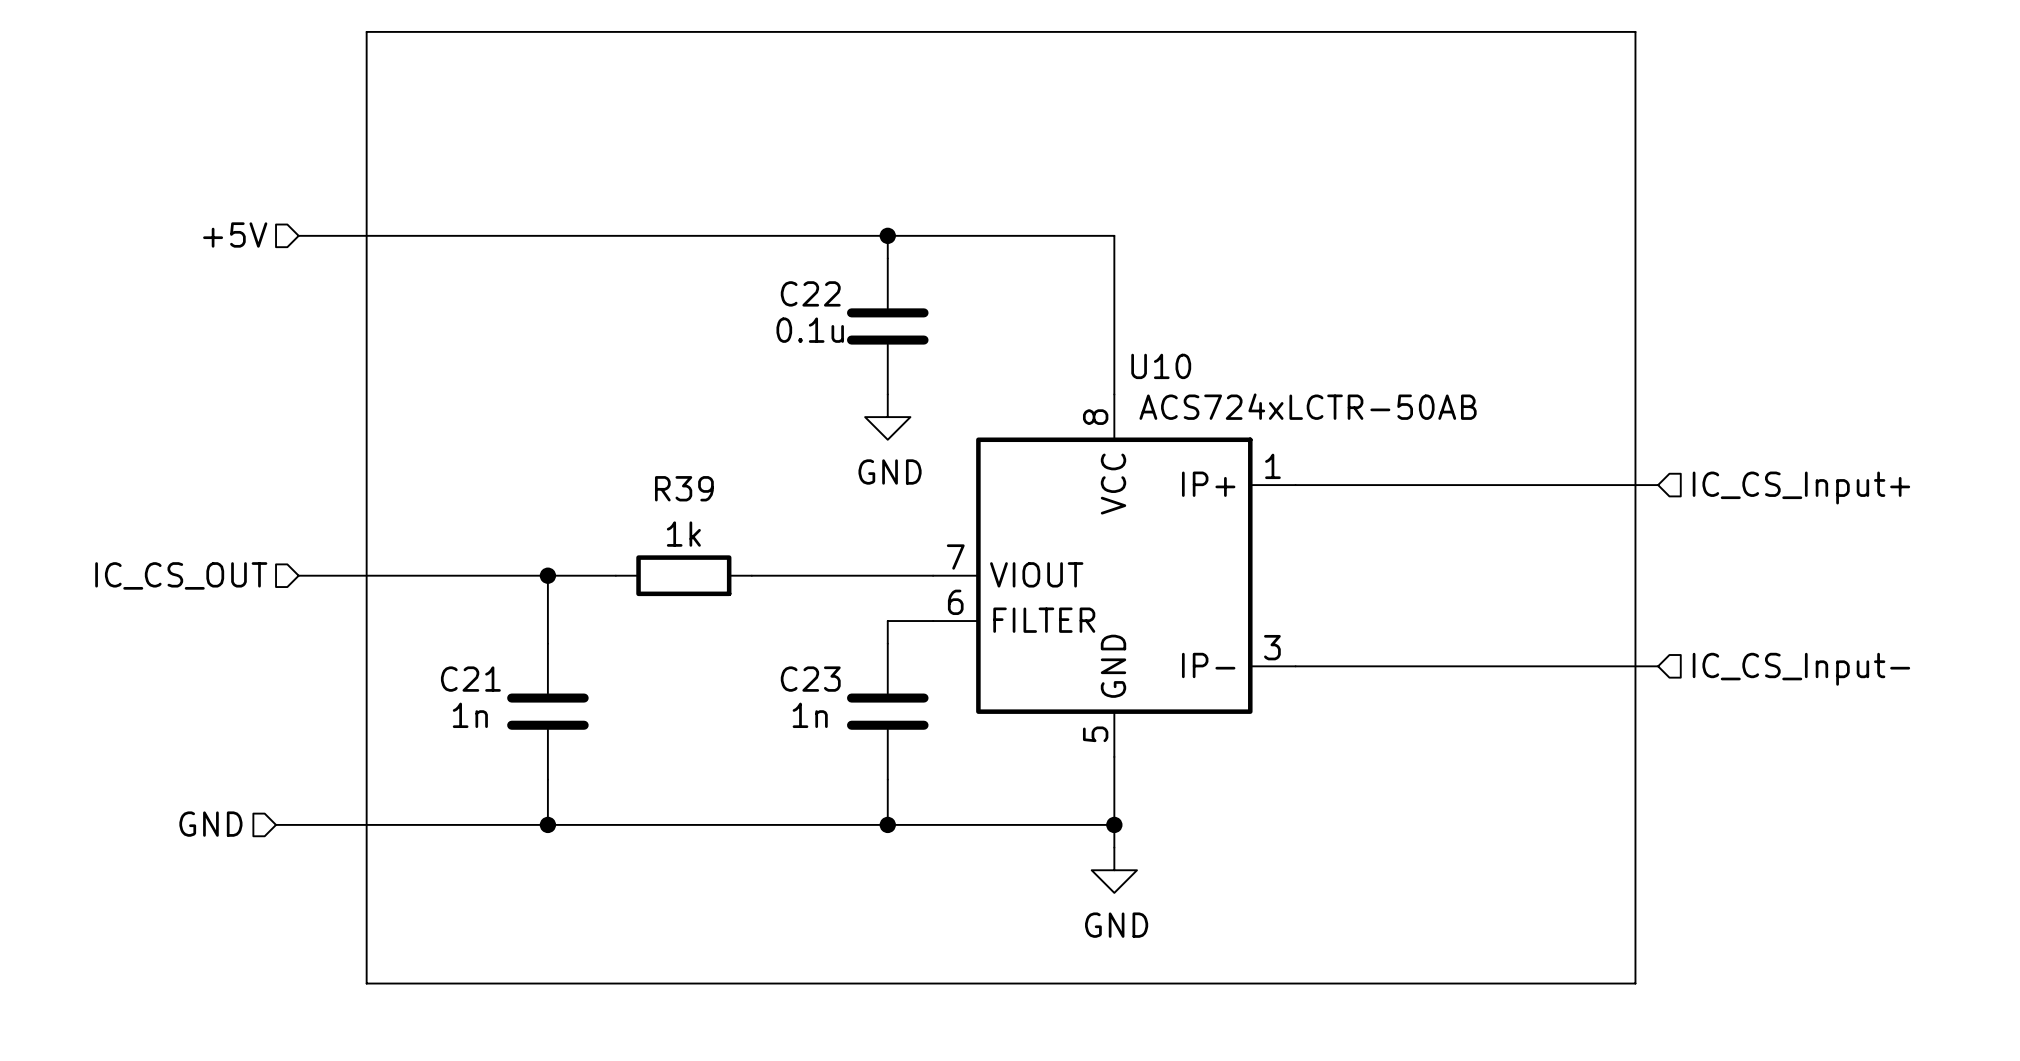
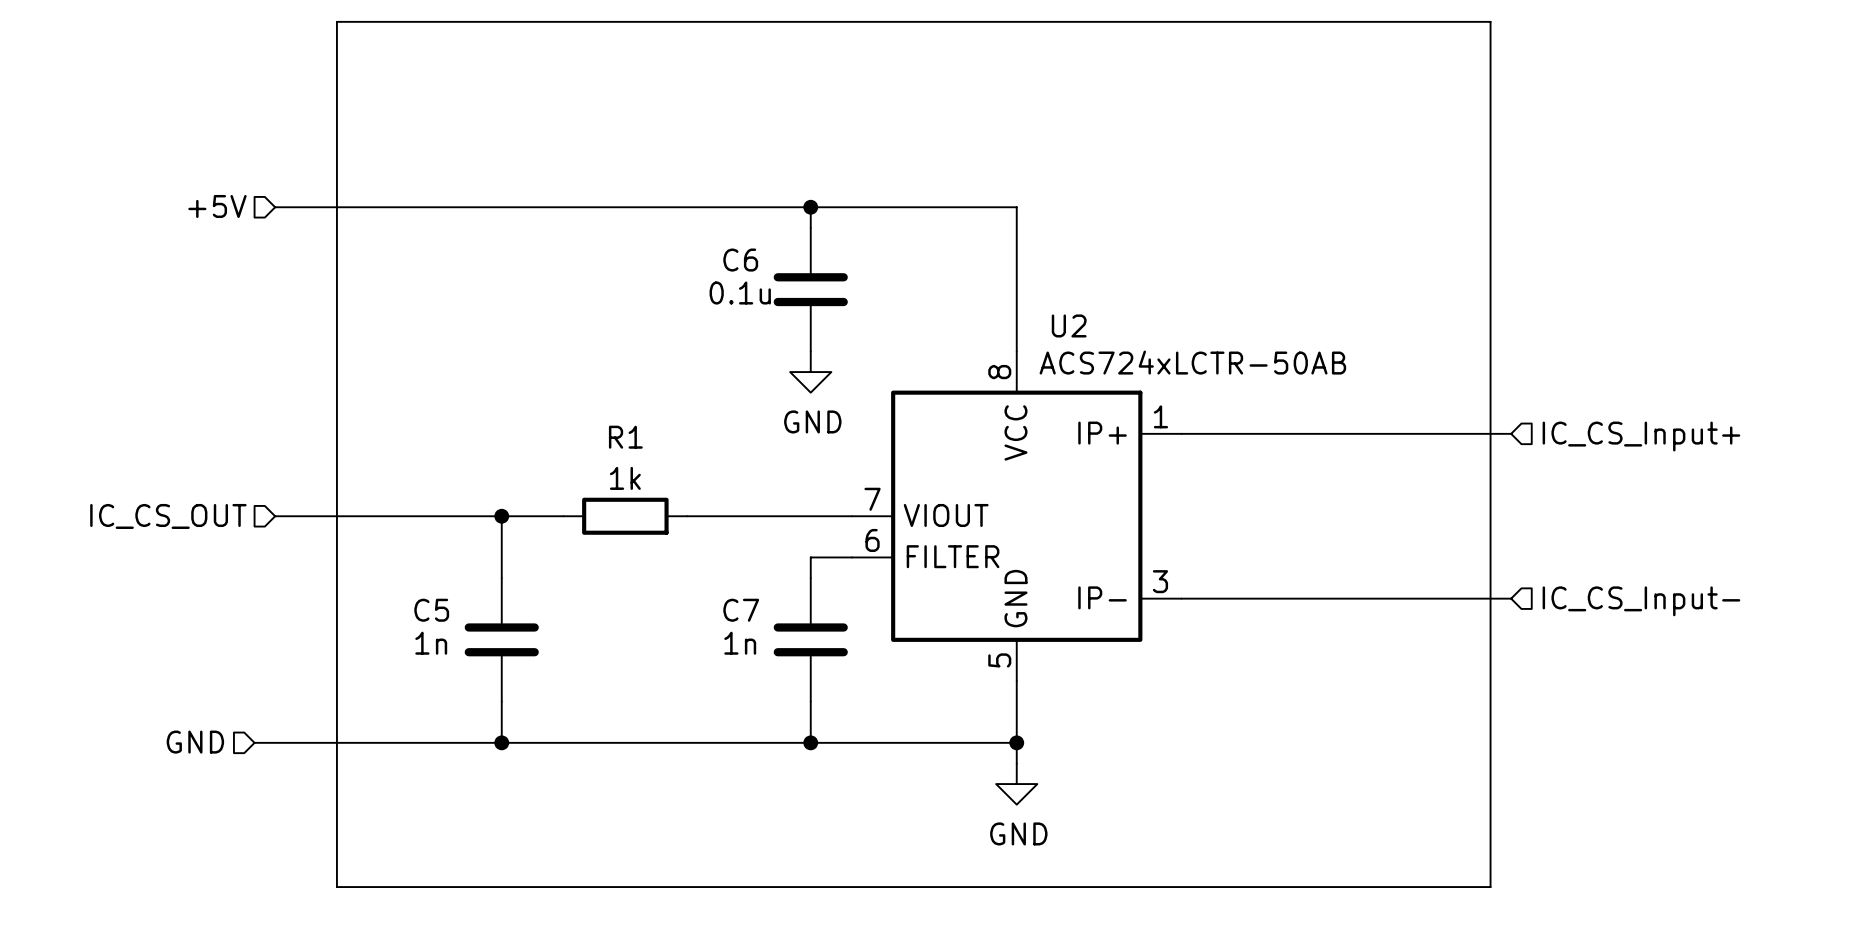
C22 name: C22 (810, 293) -> C6 (740, 260)
U10 name: U10 (1161, 366) -> U2 (1069, 325)
R39 name: R39 (684, 488) -> R1 (625, 437)
C21 name: C21 (470, 679) -> C5 (431, 610)
C23 name: C23 (810, 679) -> C7 (741, 610)

